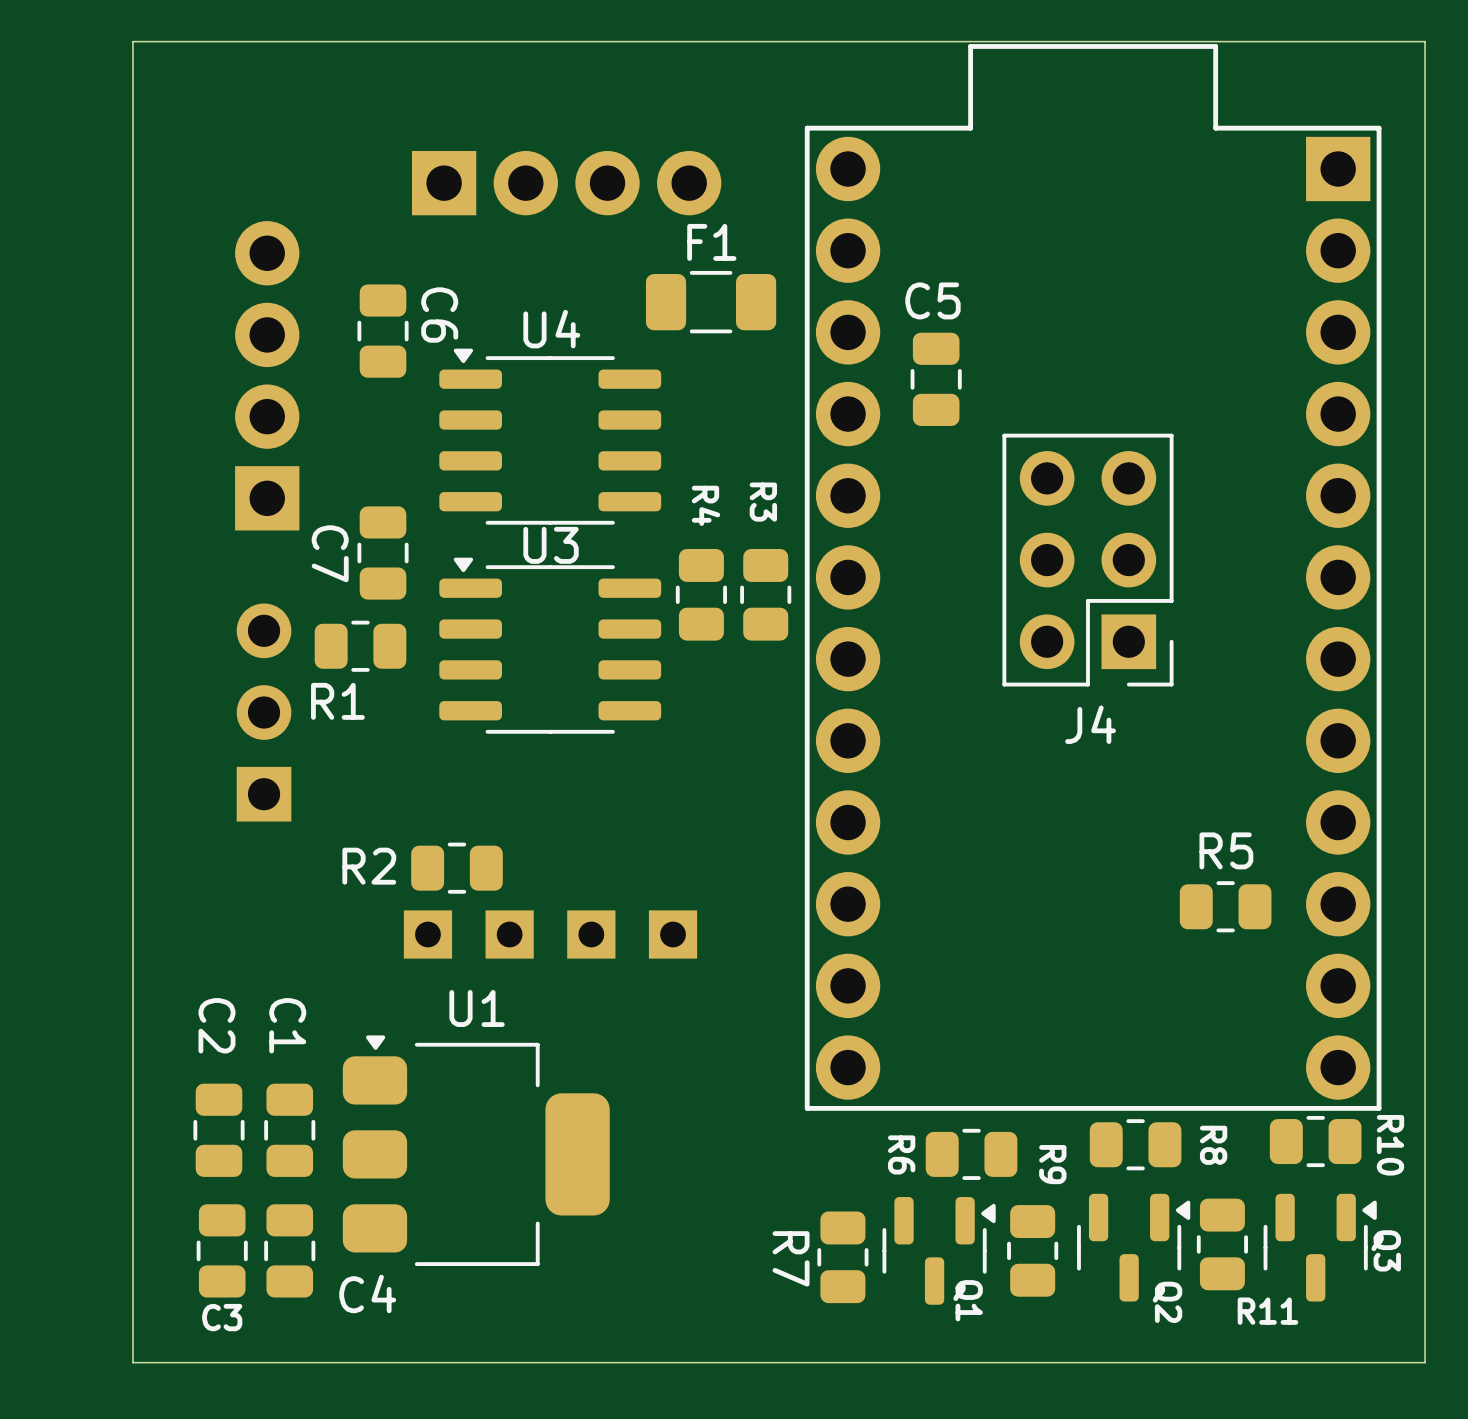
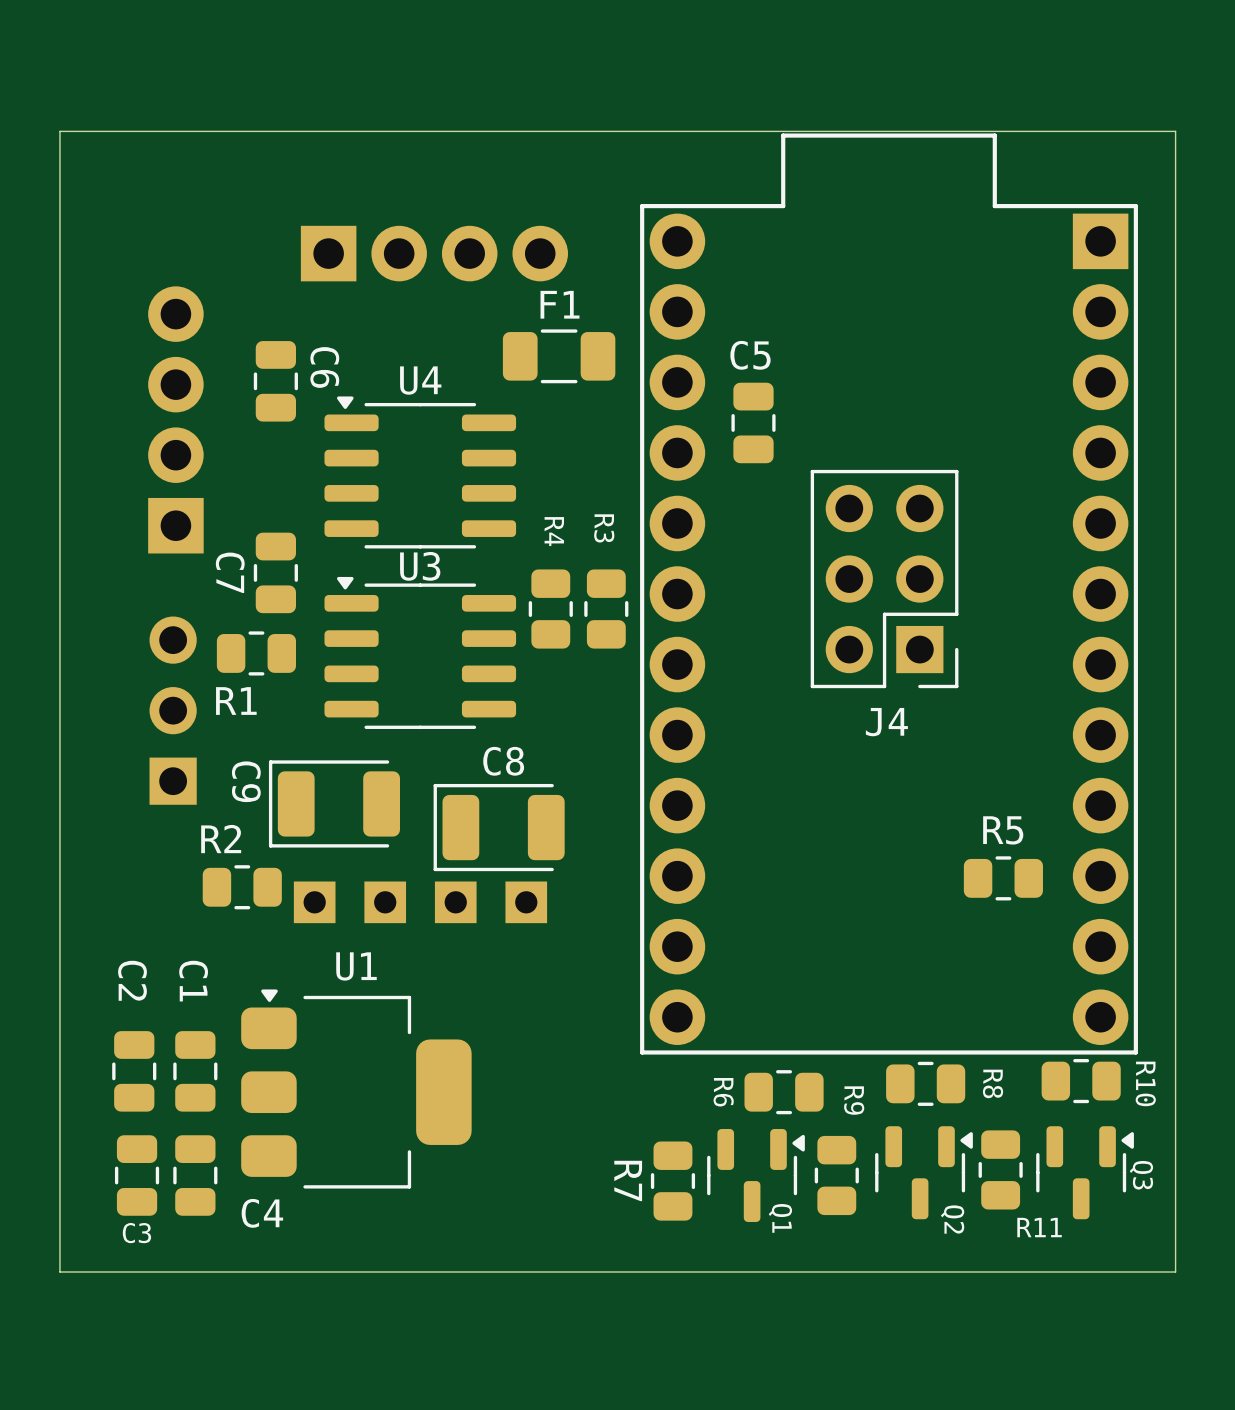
C9: none -> (334, 803)
C8: none -> (499, 827)
R2 name position: R2 (369, 866) -> R2 (221, 839)
R2 position: (456, 868) -> (242, 887)

